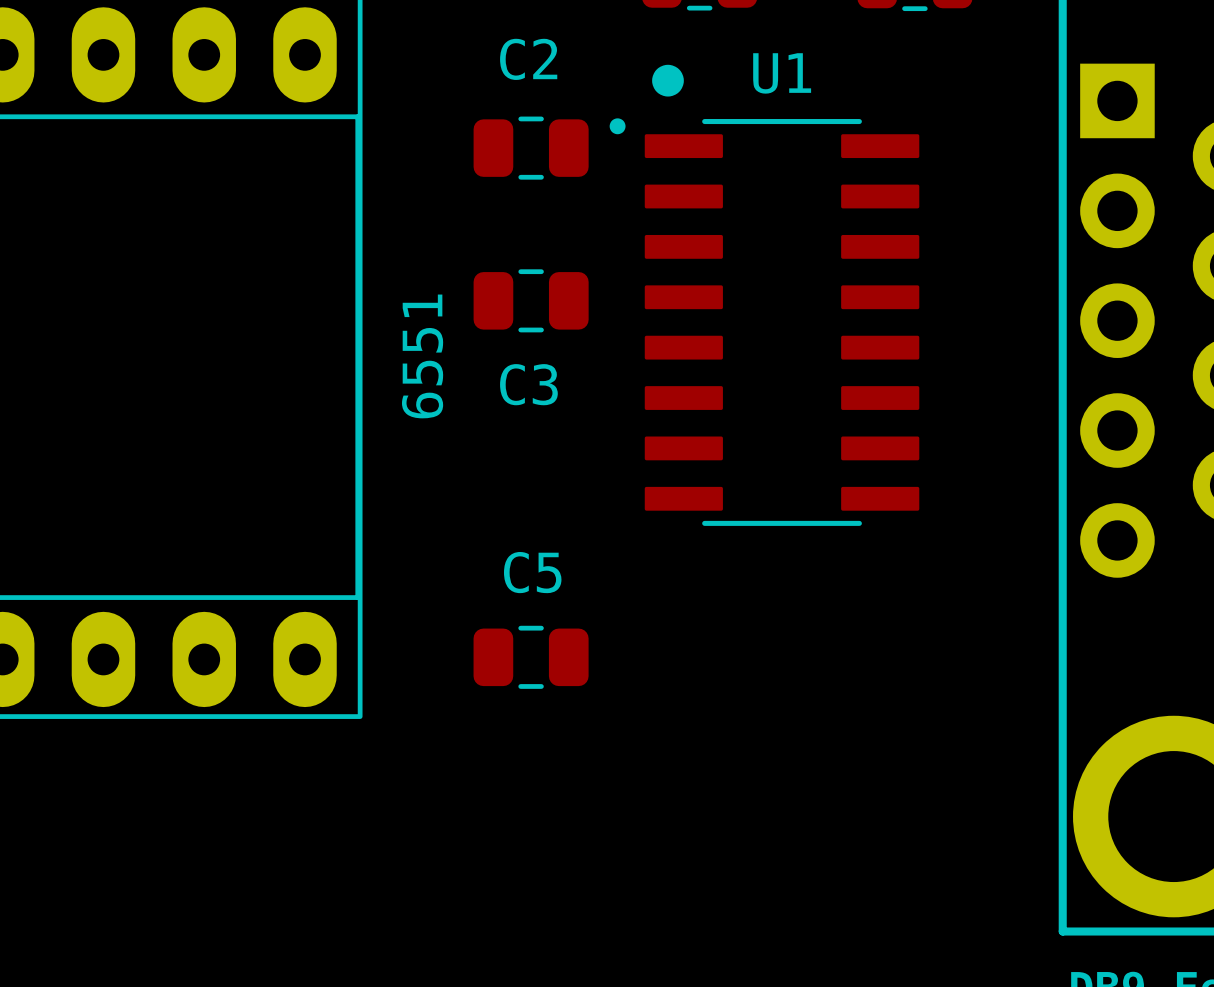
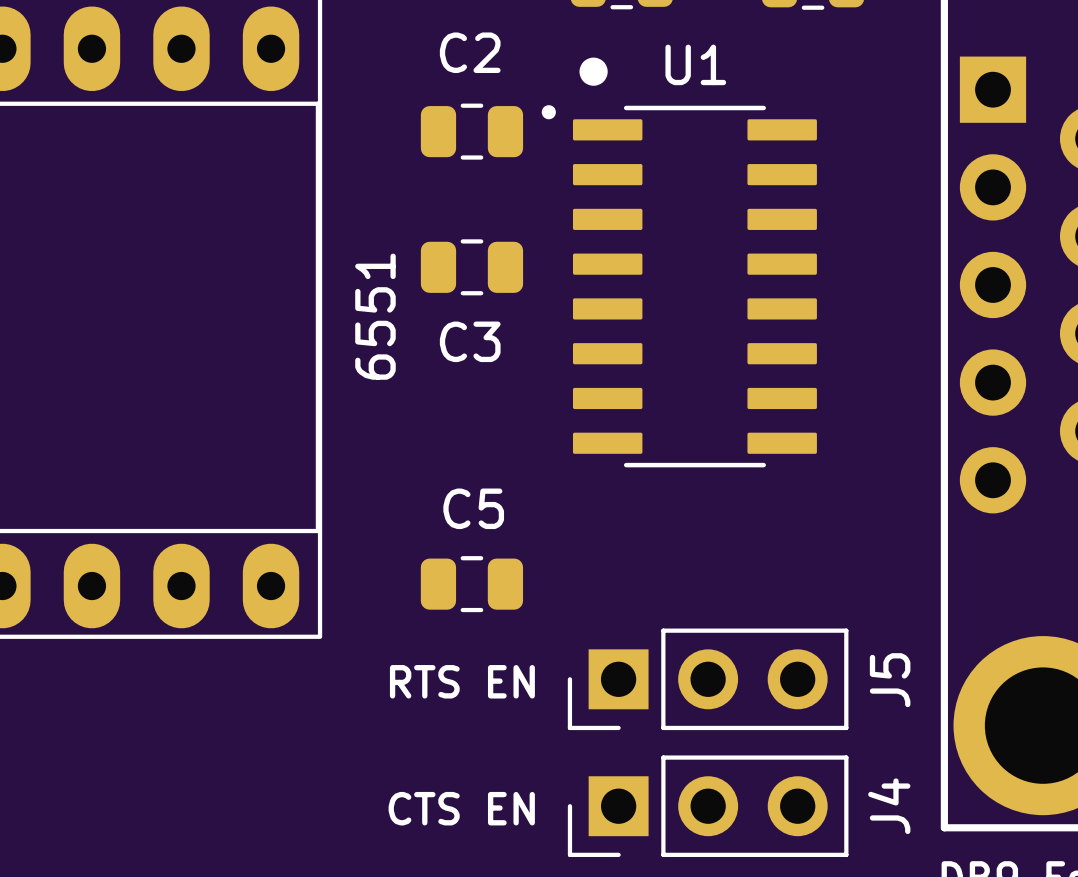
J5: none -> RTS EN (708, 679)
J4: none -> CTS EN (708, 806)

